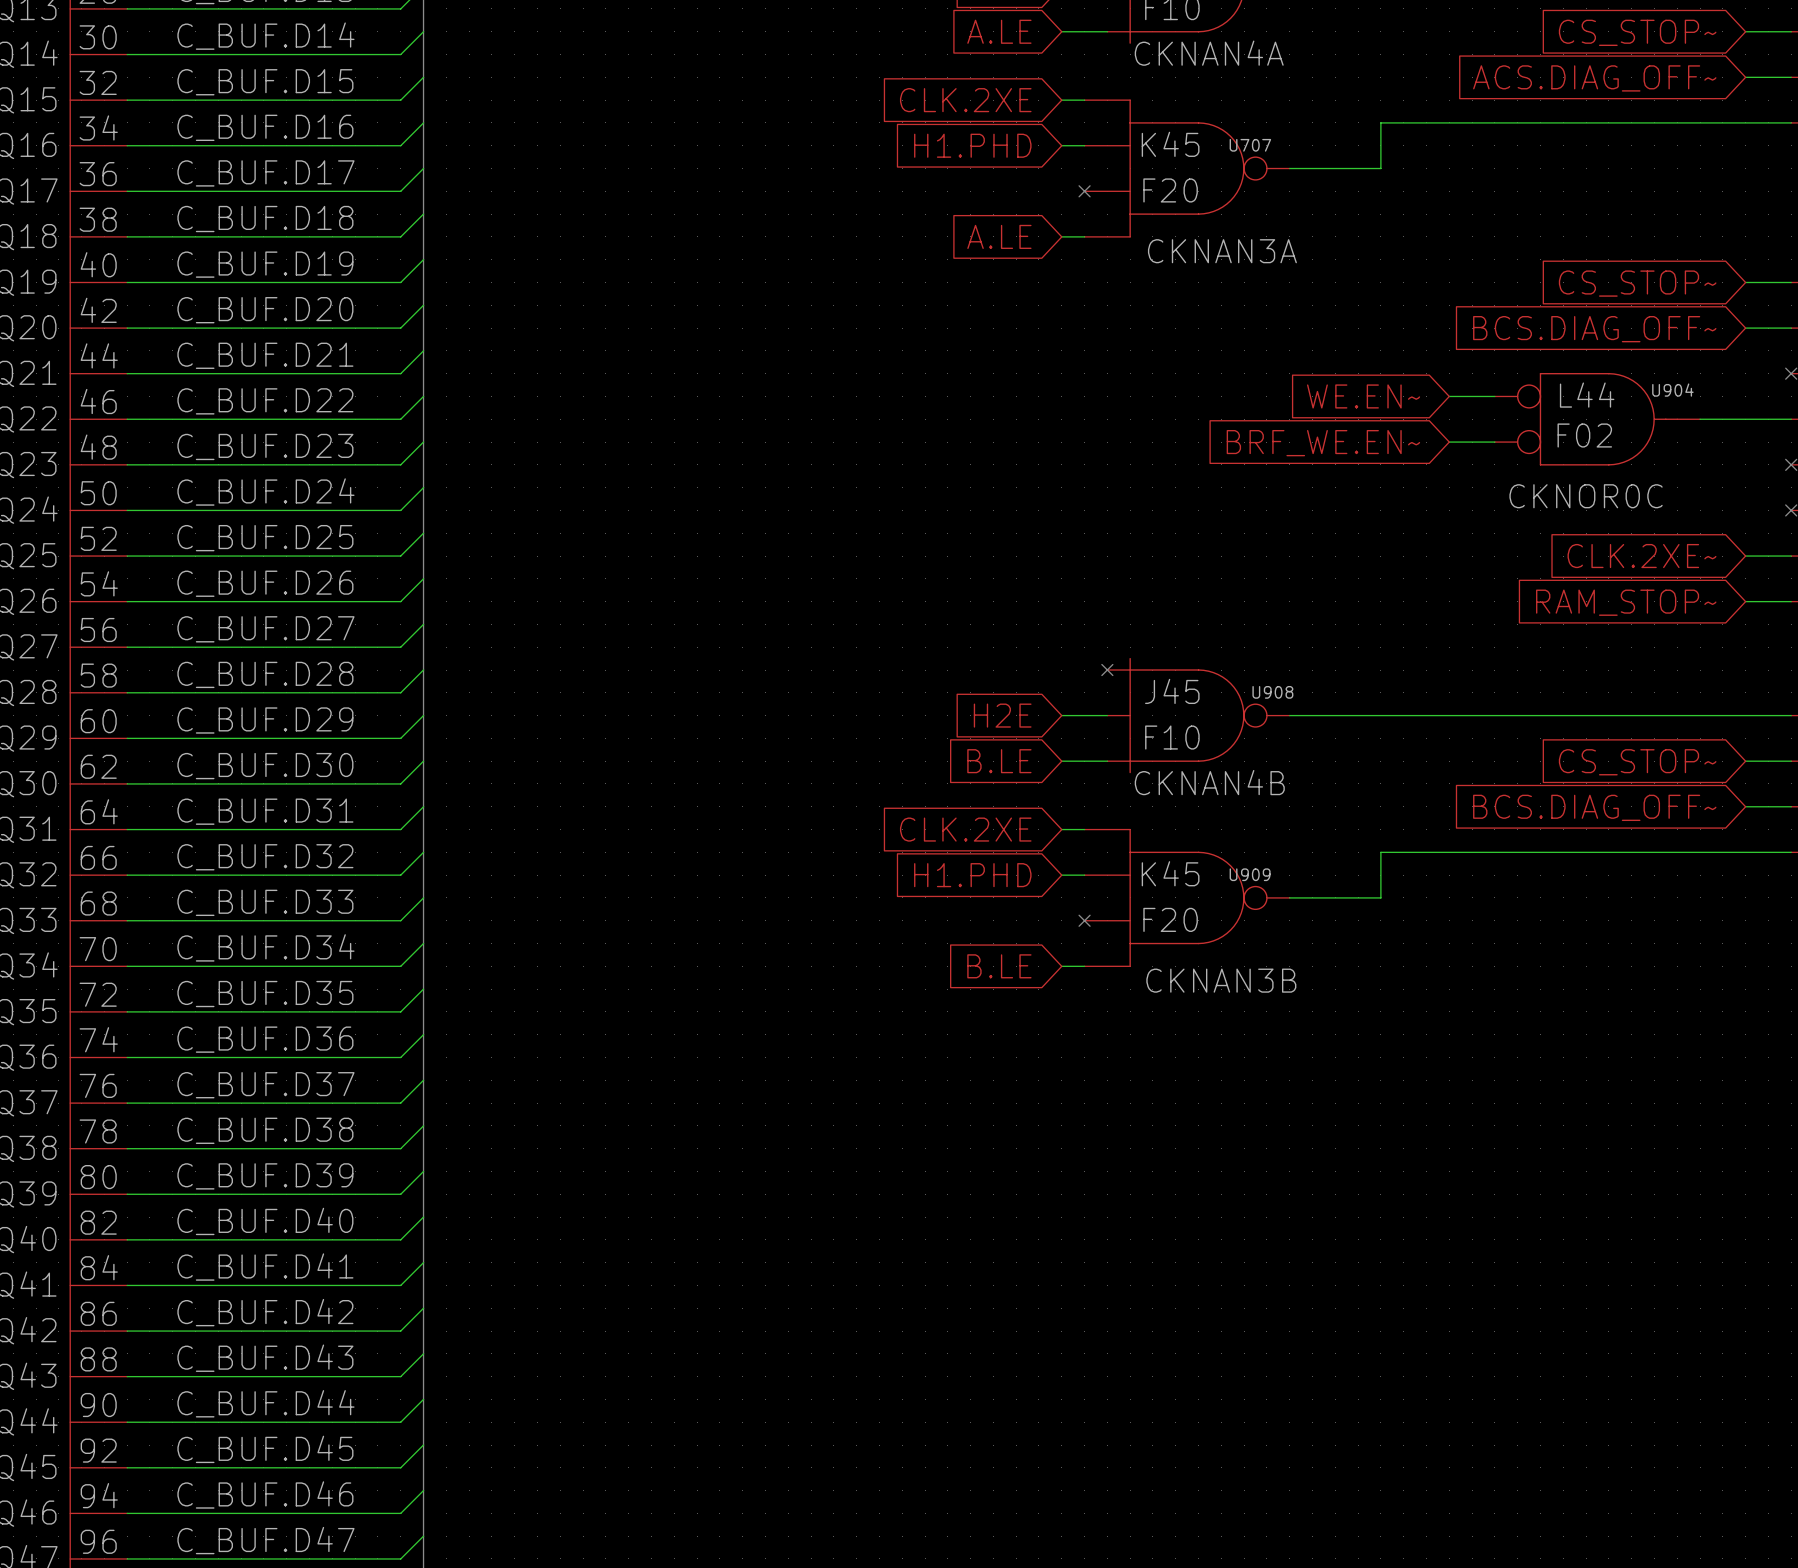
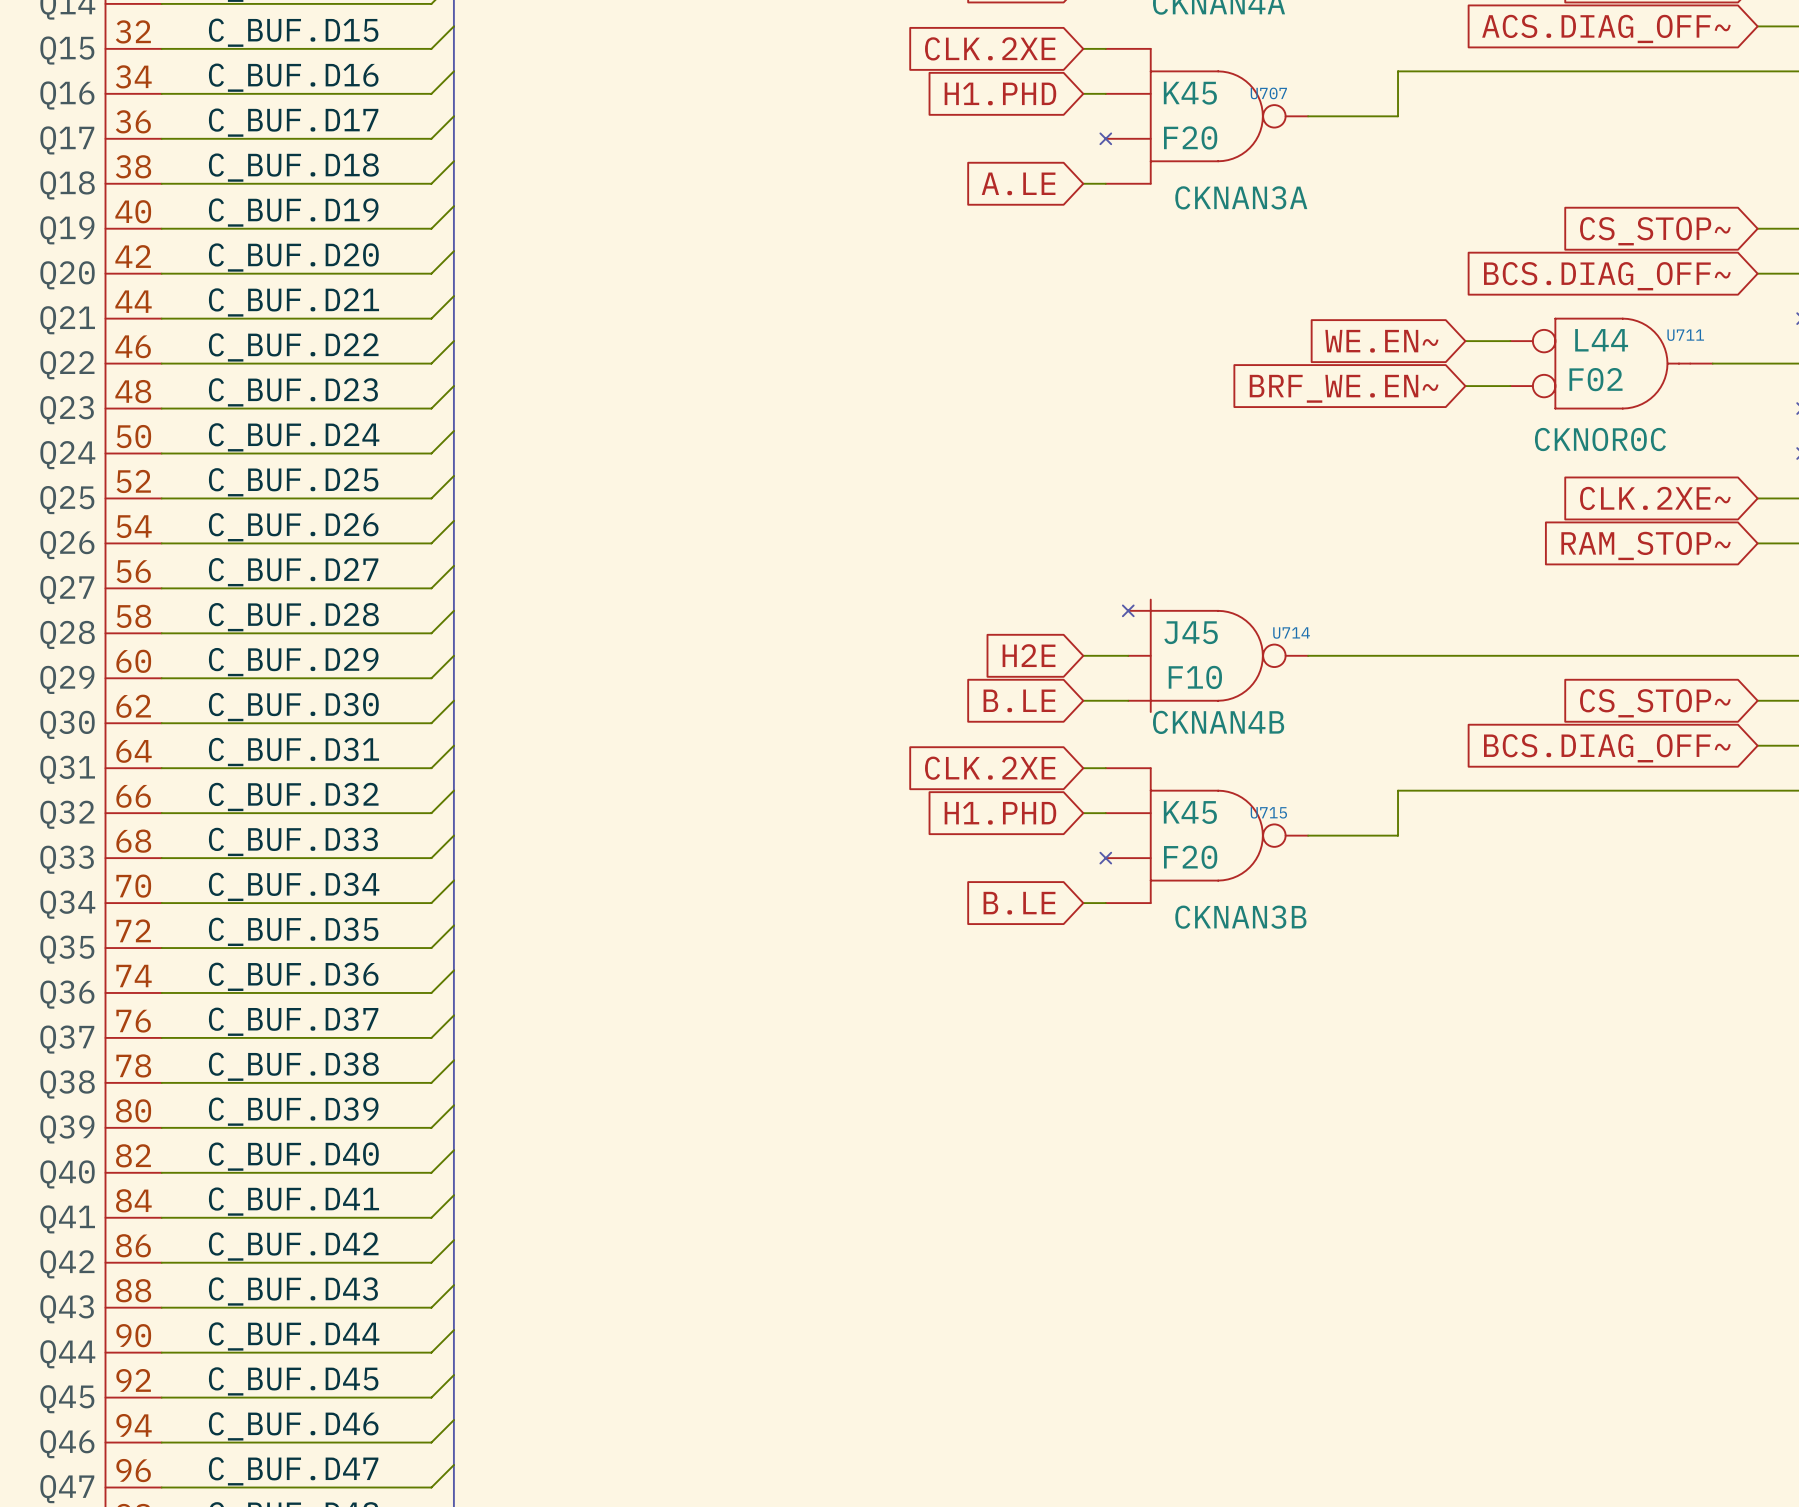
U904 name: U904 (1672, 390) -> U711 (1685, 335)
U908 name: U908 (1272, 692) -> U714 (1291, 633)
U909 name: U909 (1250, 874) -> U715 (1268, 812)

